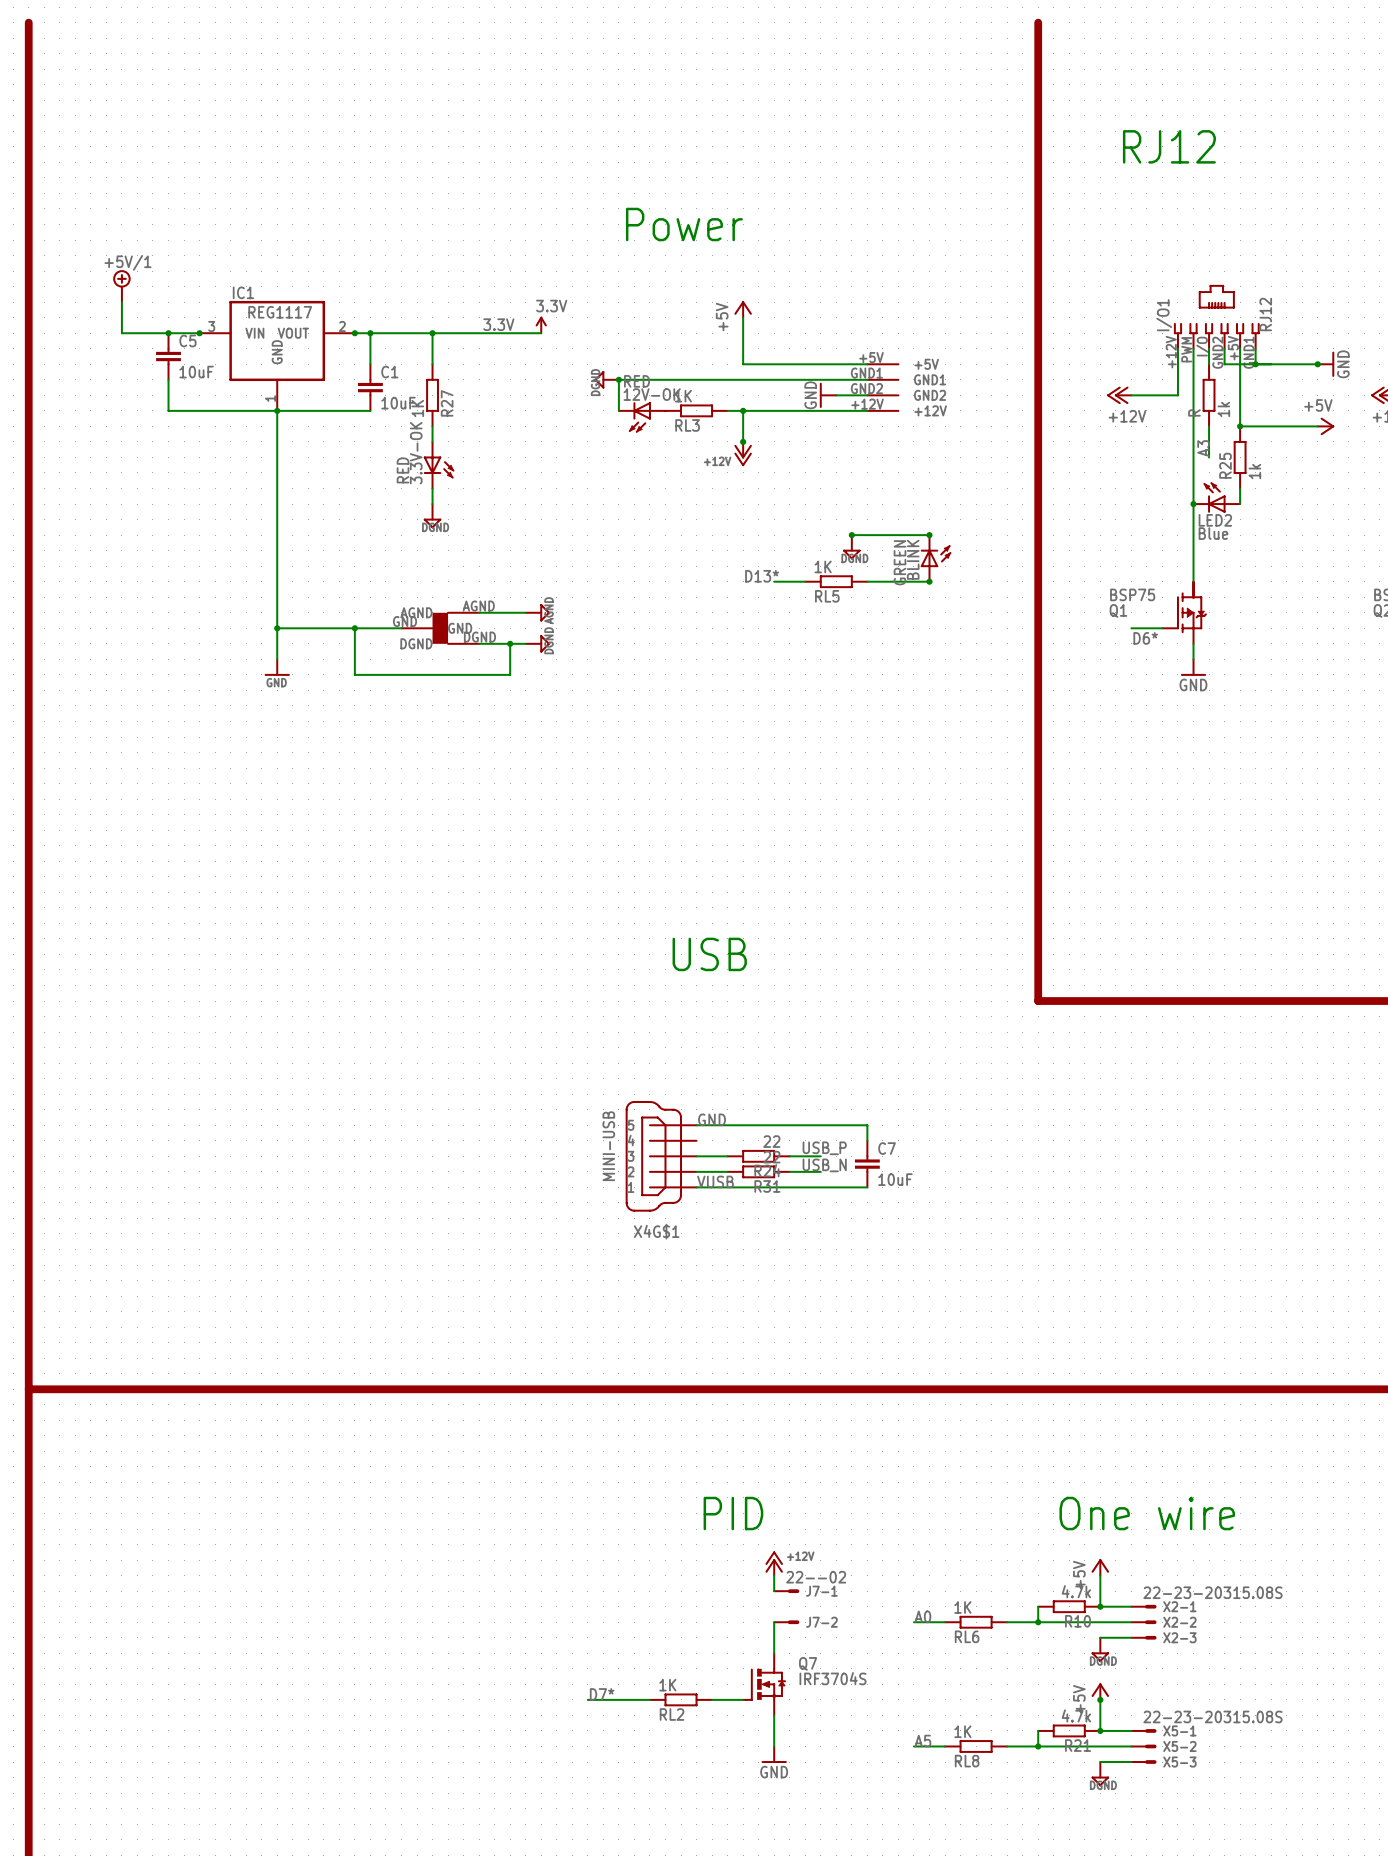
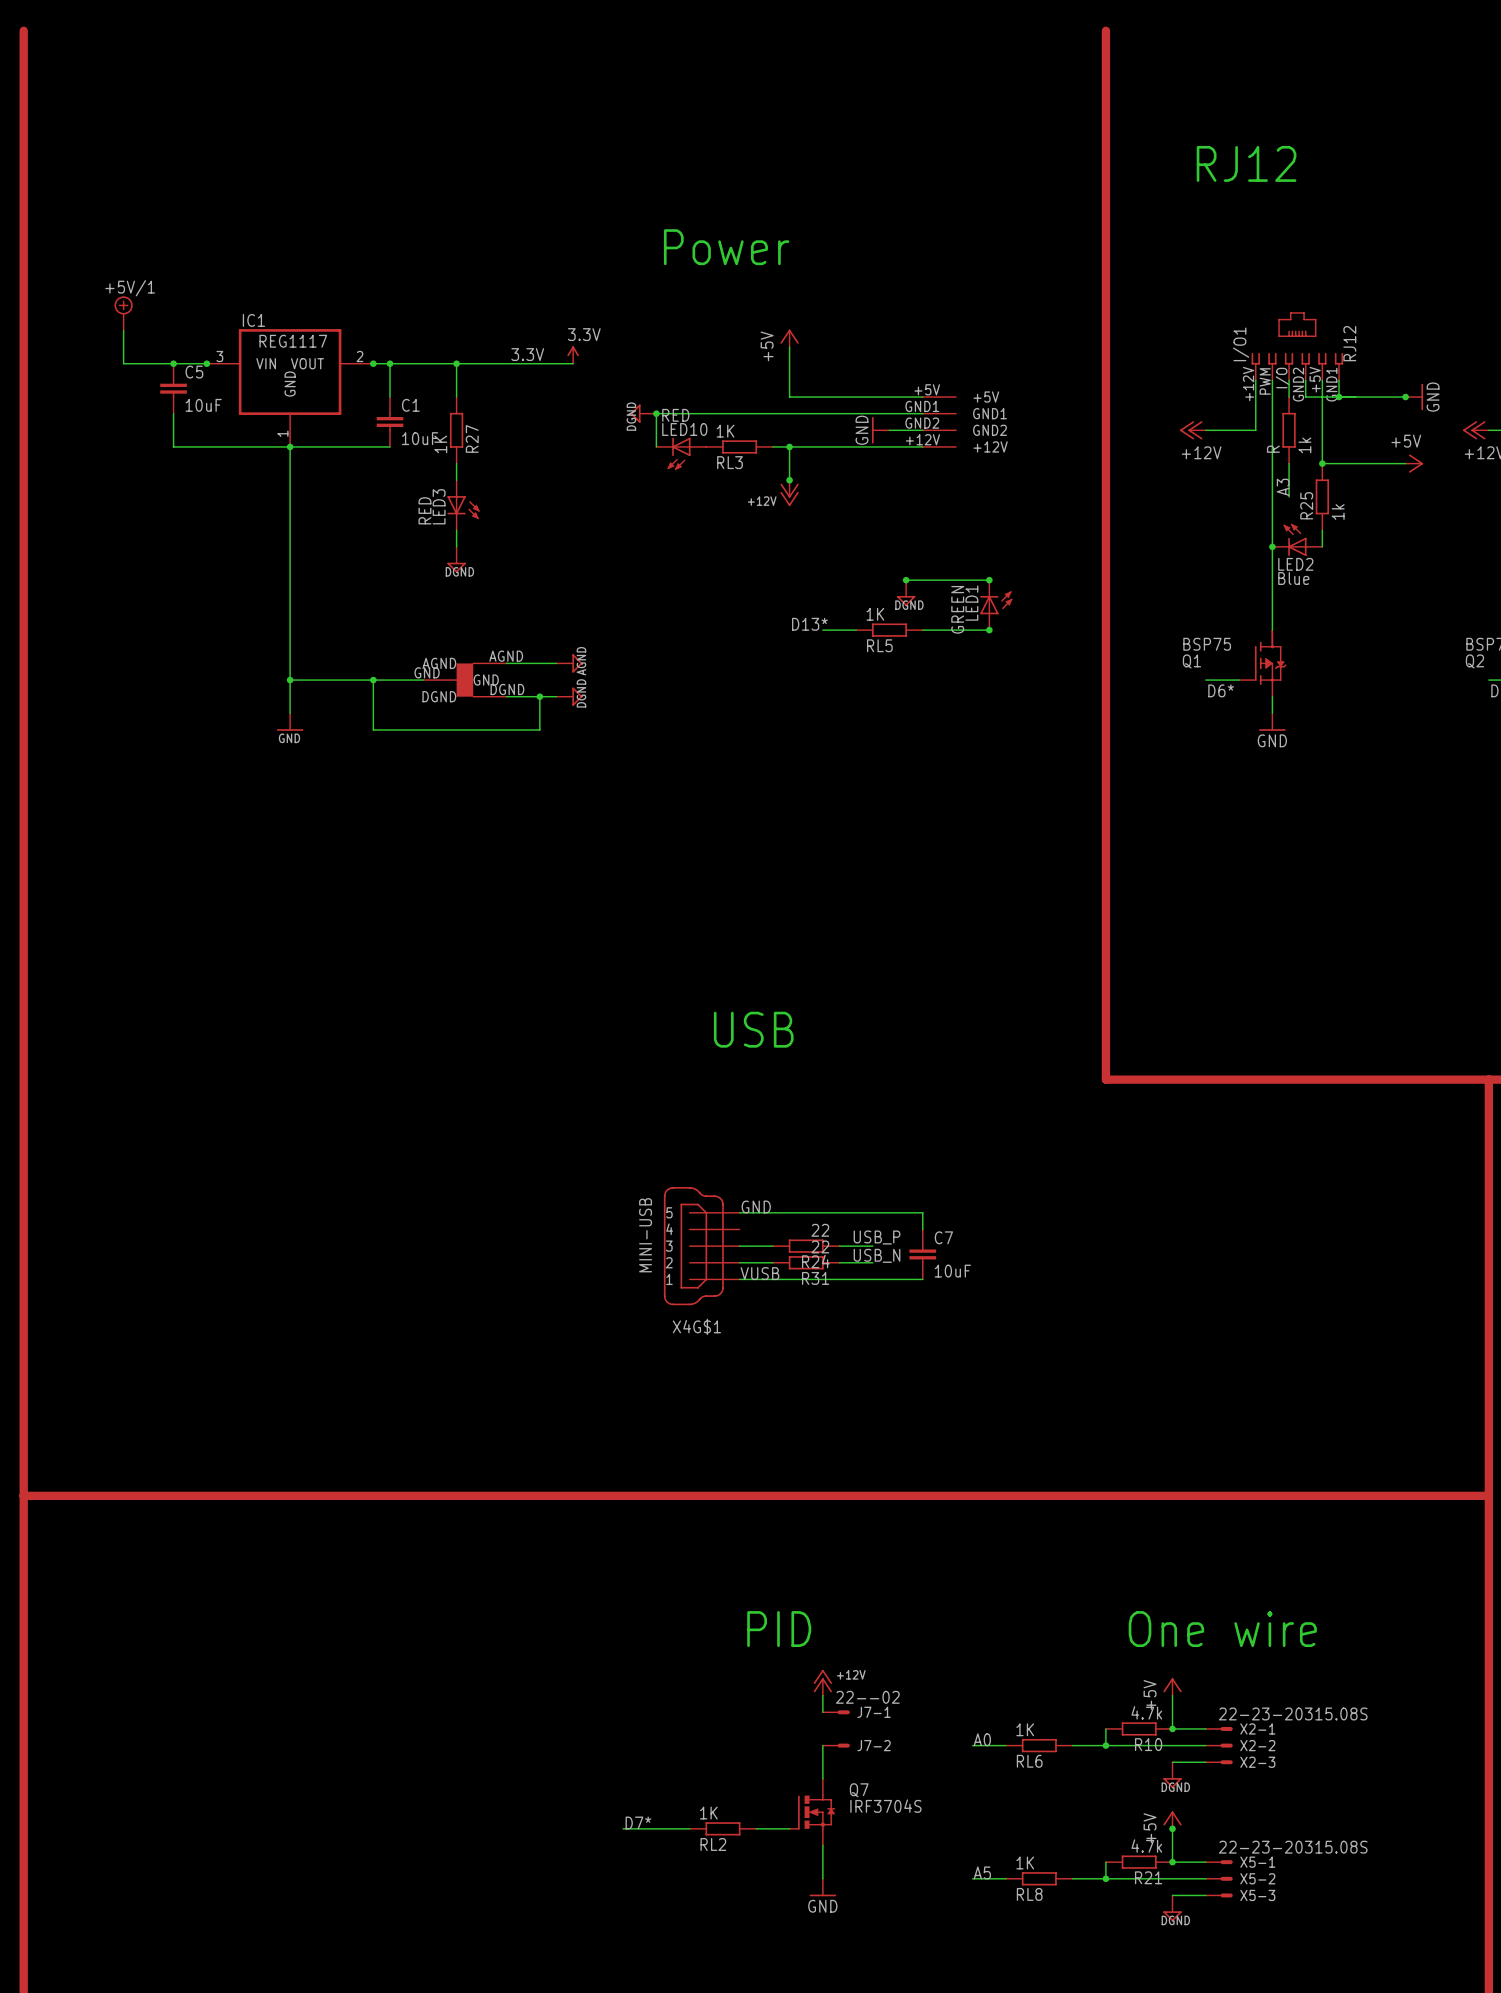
12V-OK name: 12V-OK (652, 394) -> LED10 (684, 429)
3.3V-OK name: 3.3V-OK (416, 453) -> LED3 (439, 506)
BLINK name: BLINK (913, 559) -> LED1 (971, 603)

